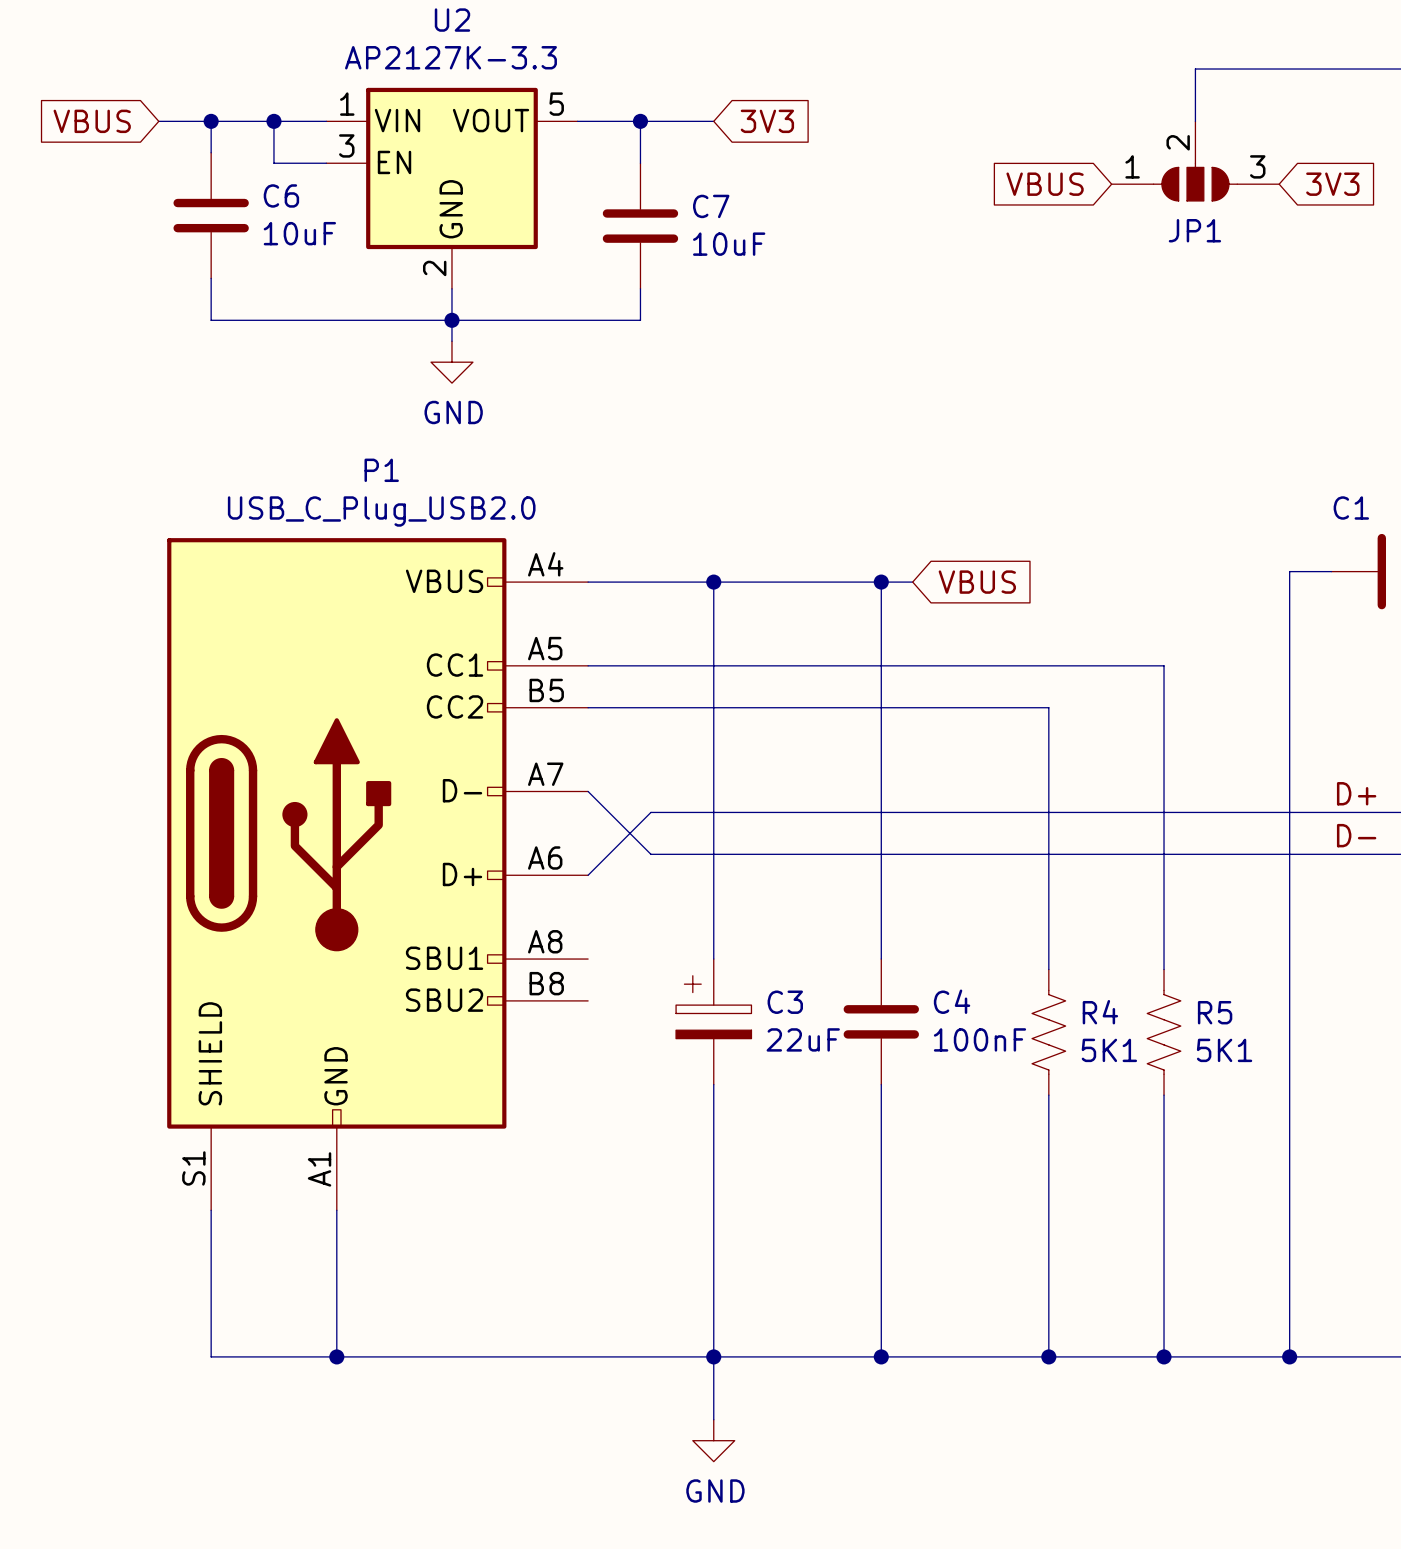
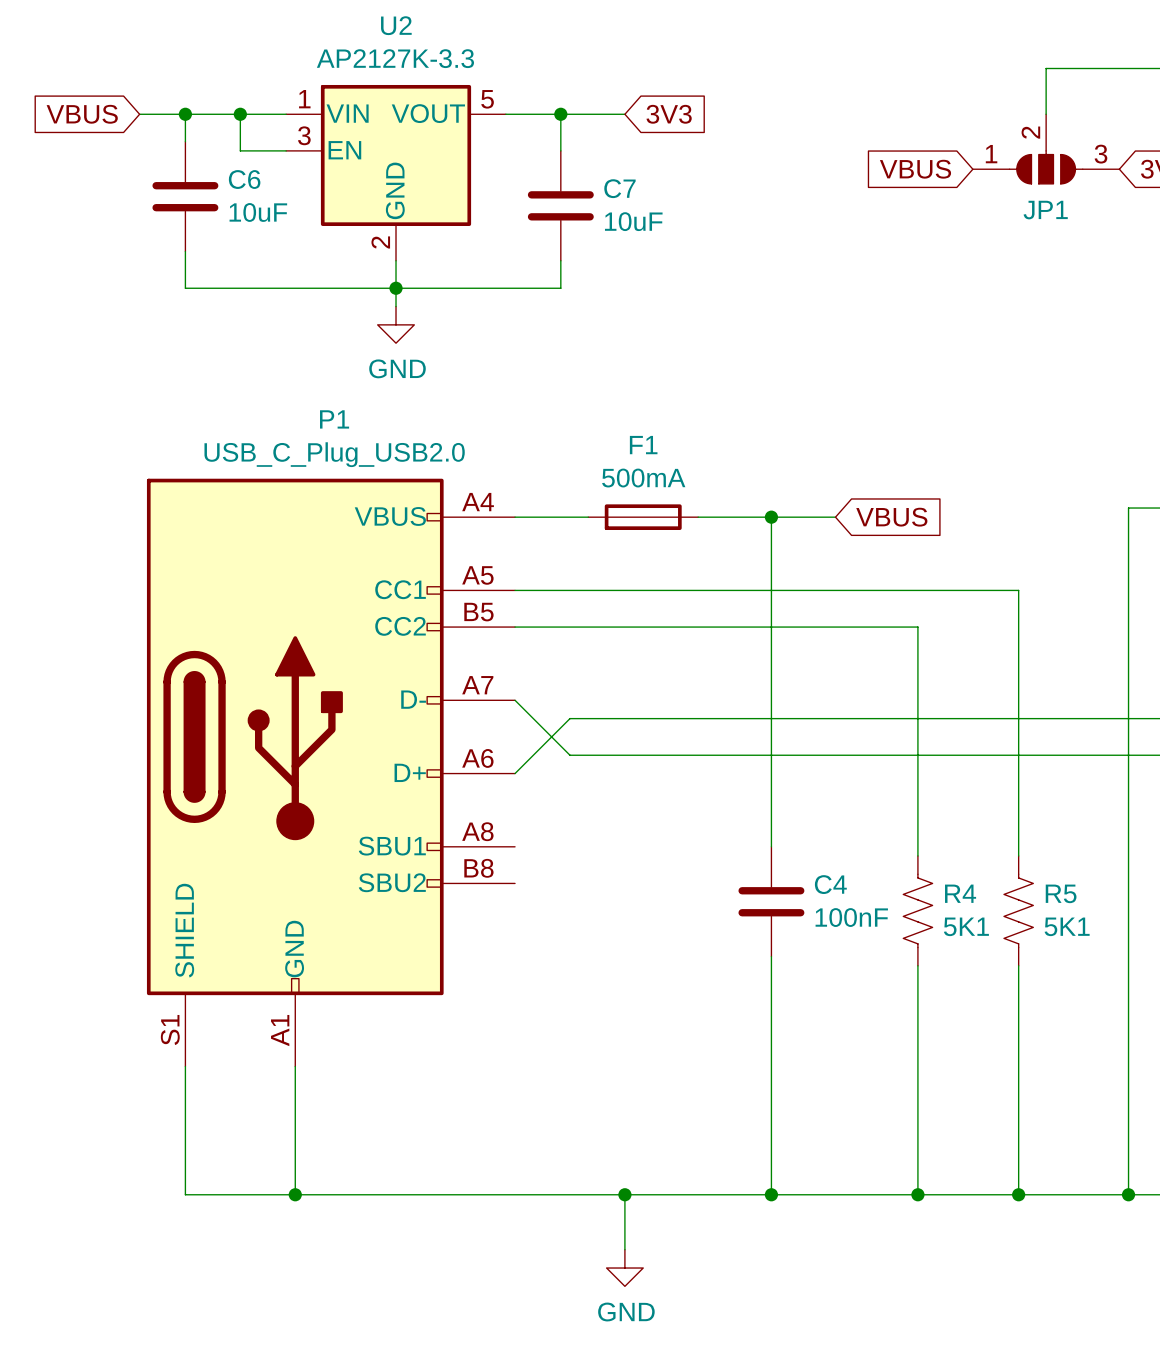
wire: (713, 582) (713, 959) -> none
junction: (713, 582) -> none
F1: none -> 500mA (643, 517)
wire: none -> (798, 517) (835, 517)
global label position: VBUS (977, 582) -> VBUS (891, 517)
C3: 22uF (713, 1021) -> none
wire: (713, 1084) (713, 1356) -> none

